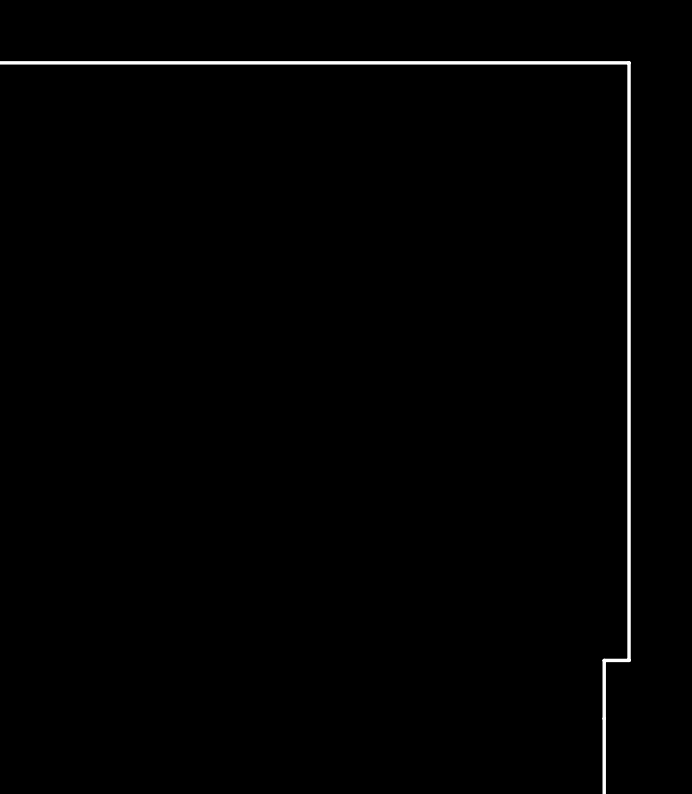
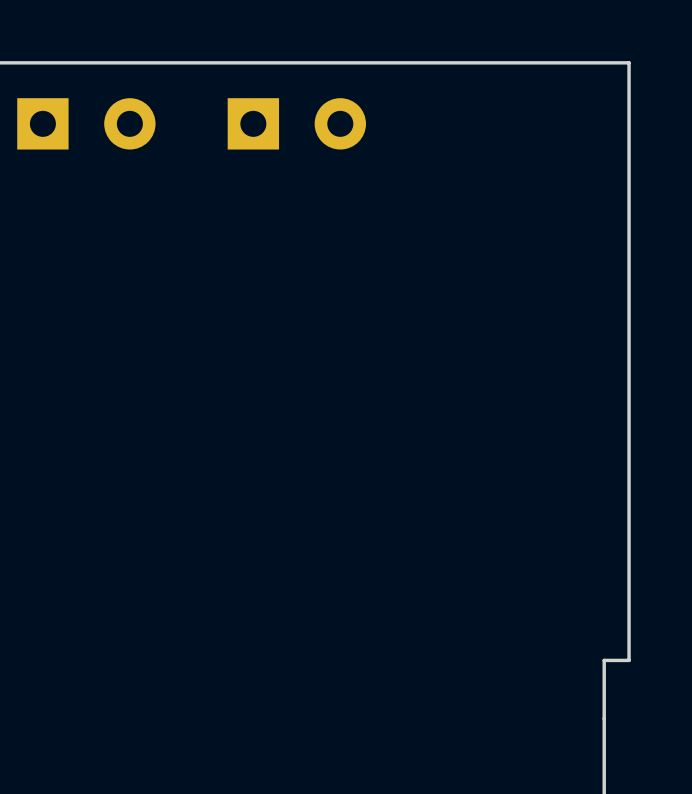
part: none -> (86, 123)
part: none -> (296, 123)

